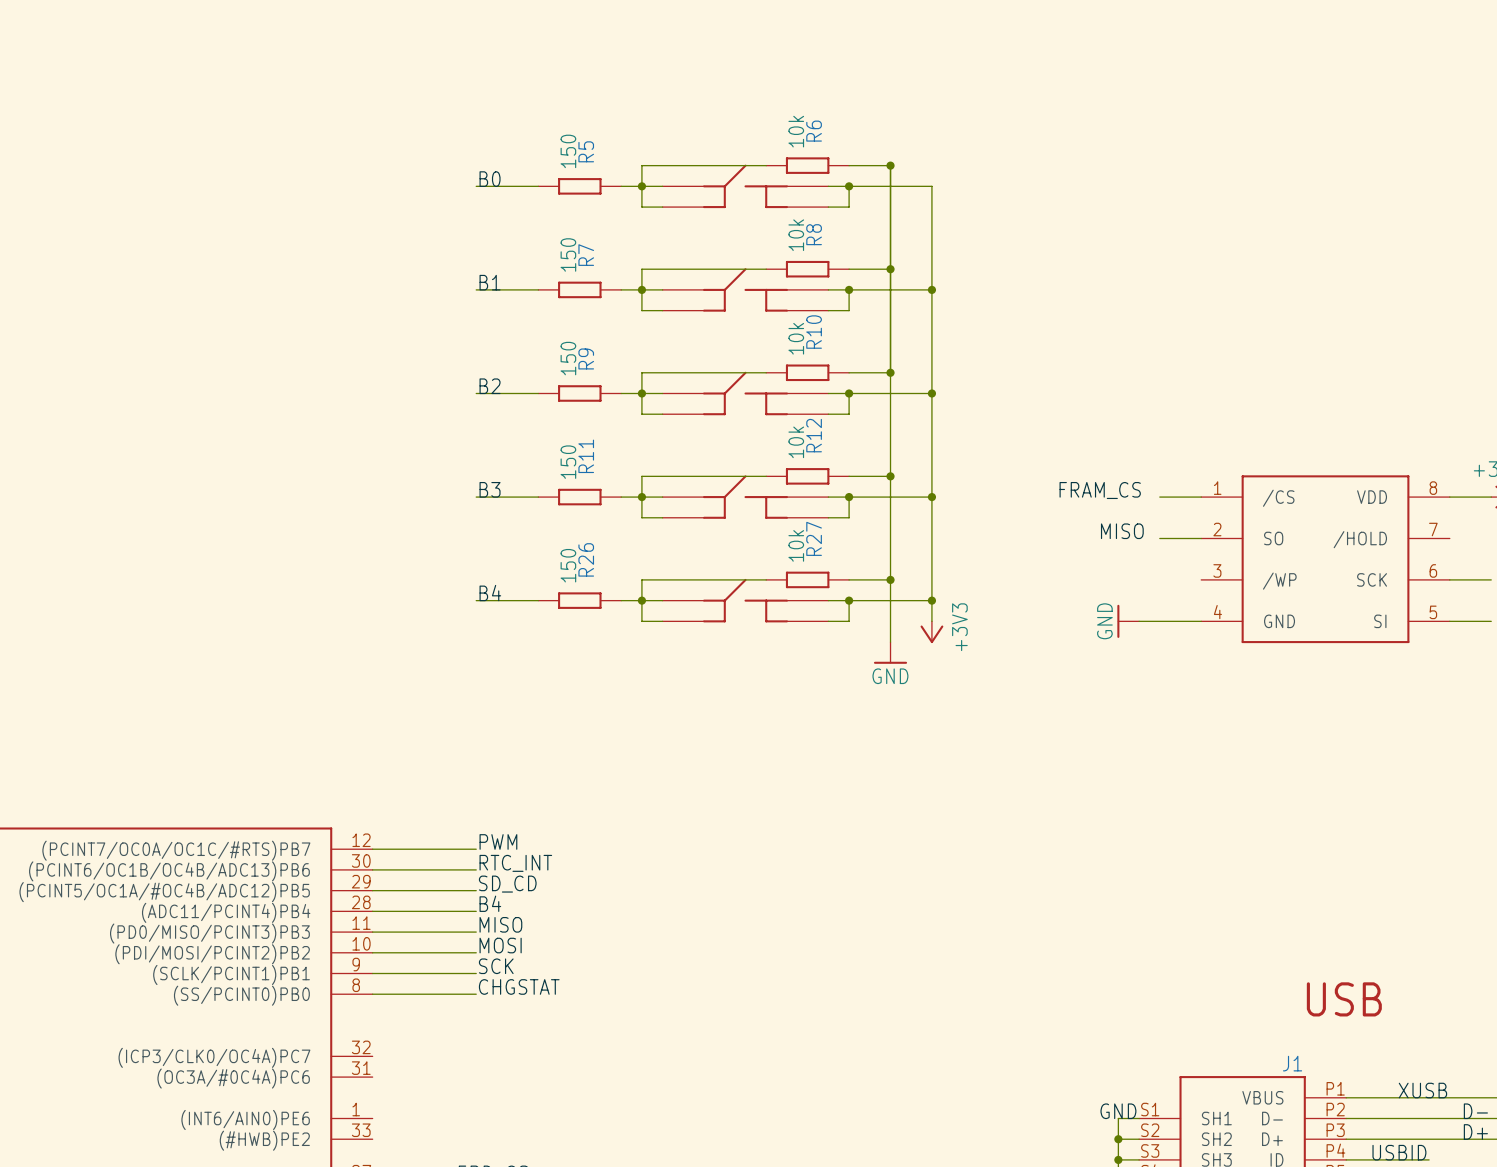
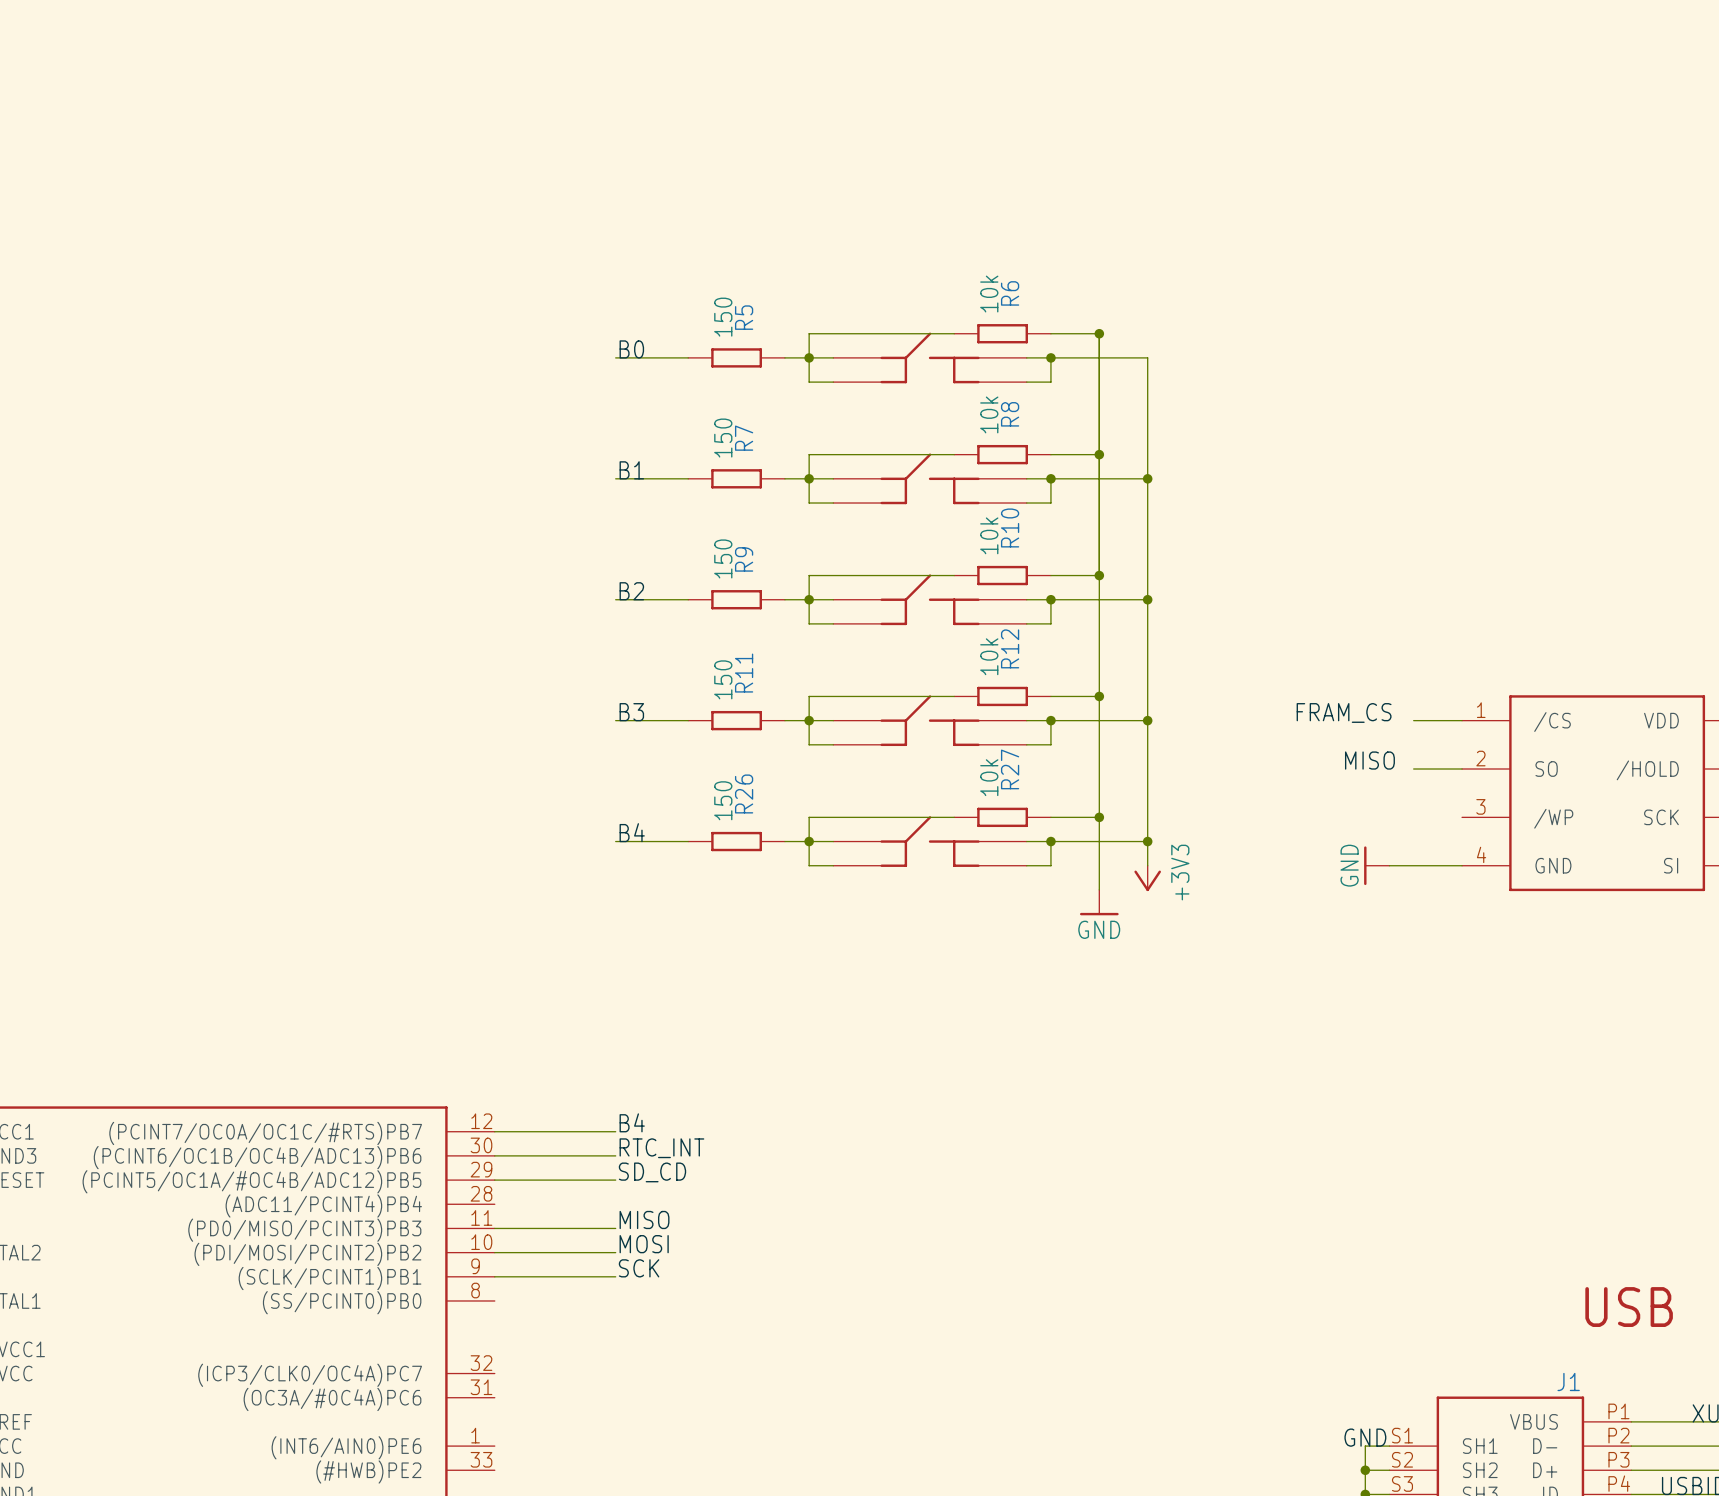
label: PWM (498, 841) -> B4 (632, 1122)
label: B4 (490, 903) -> none
wire: (372, 911) (476, 911) -> none
label: CHGSTAT (519, 986) -> none
wire: (372, 994) (476, 994) -> none

